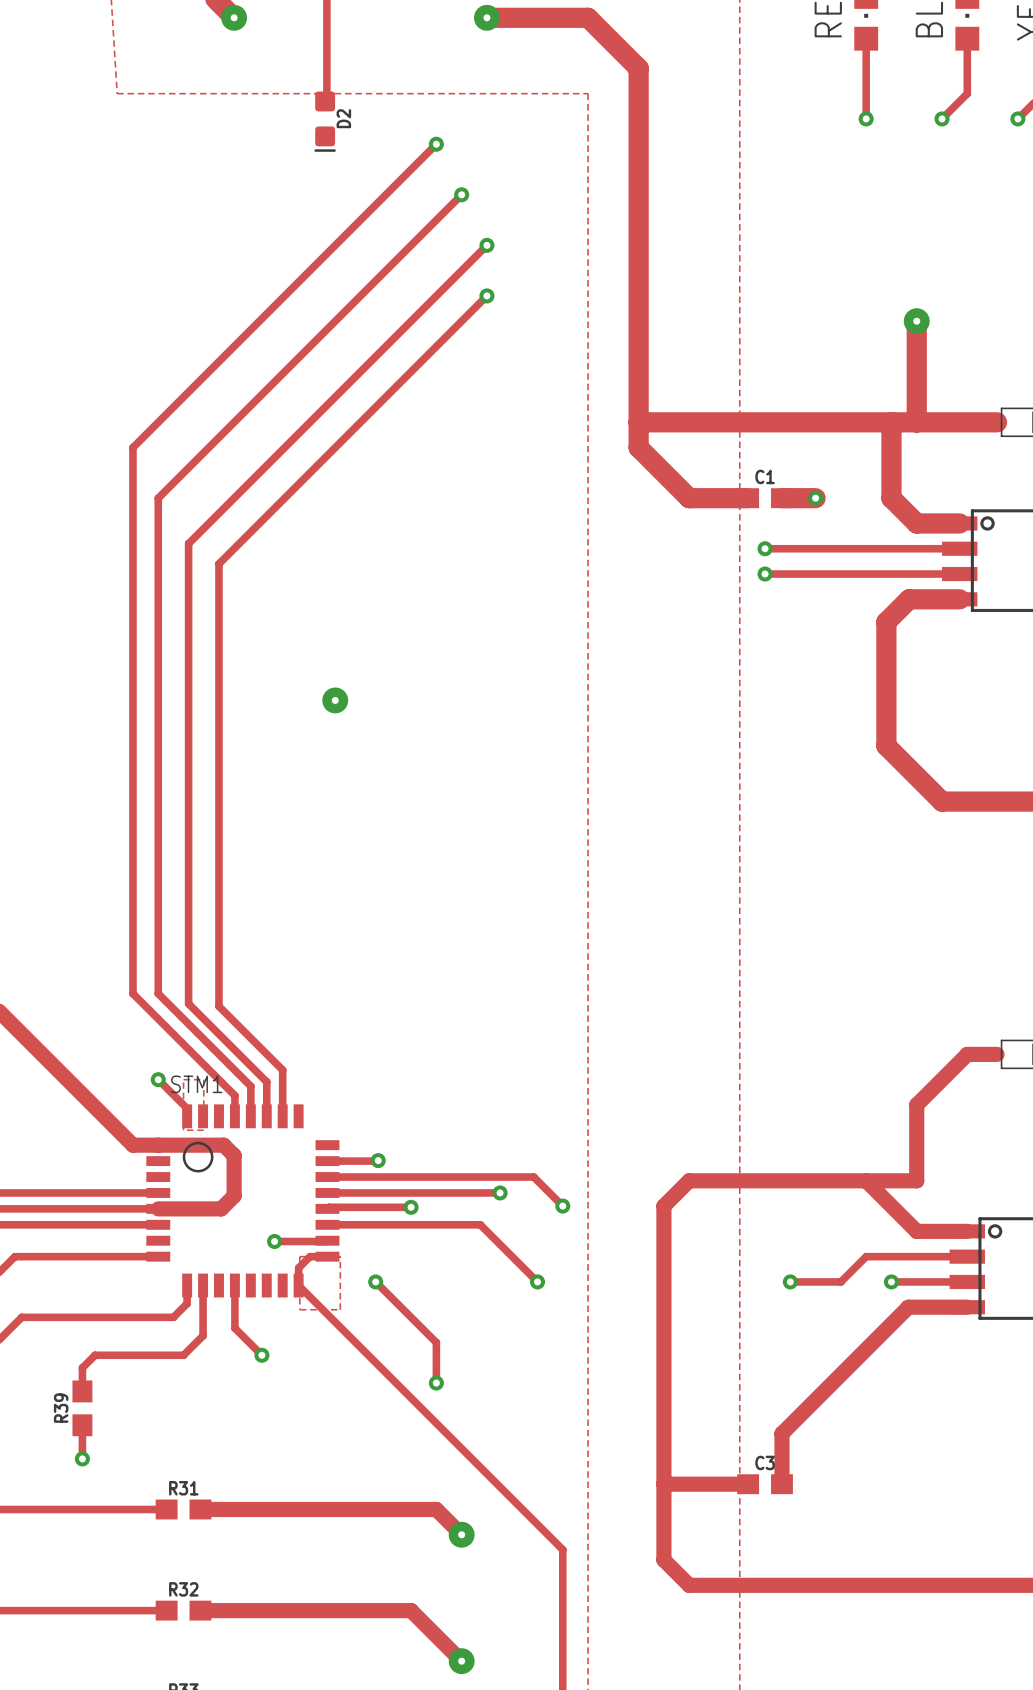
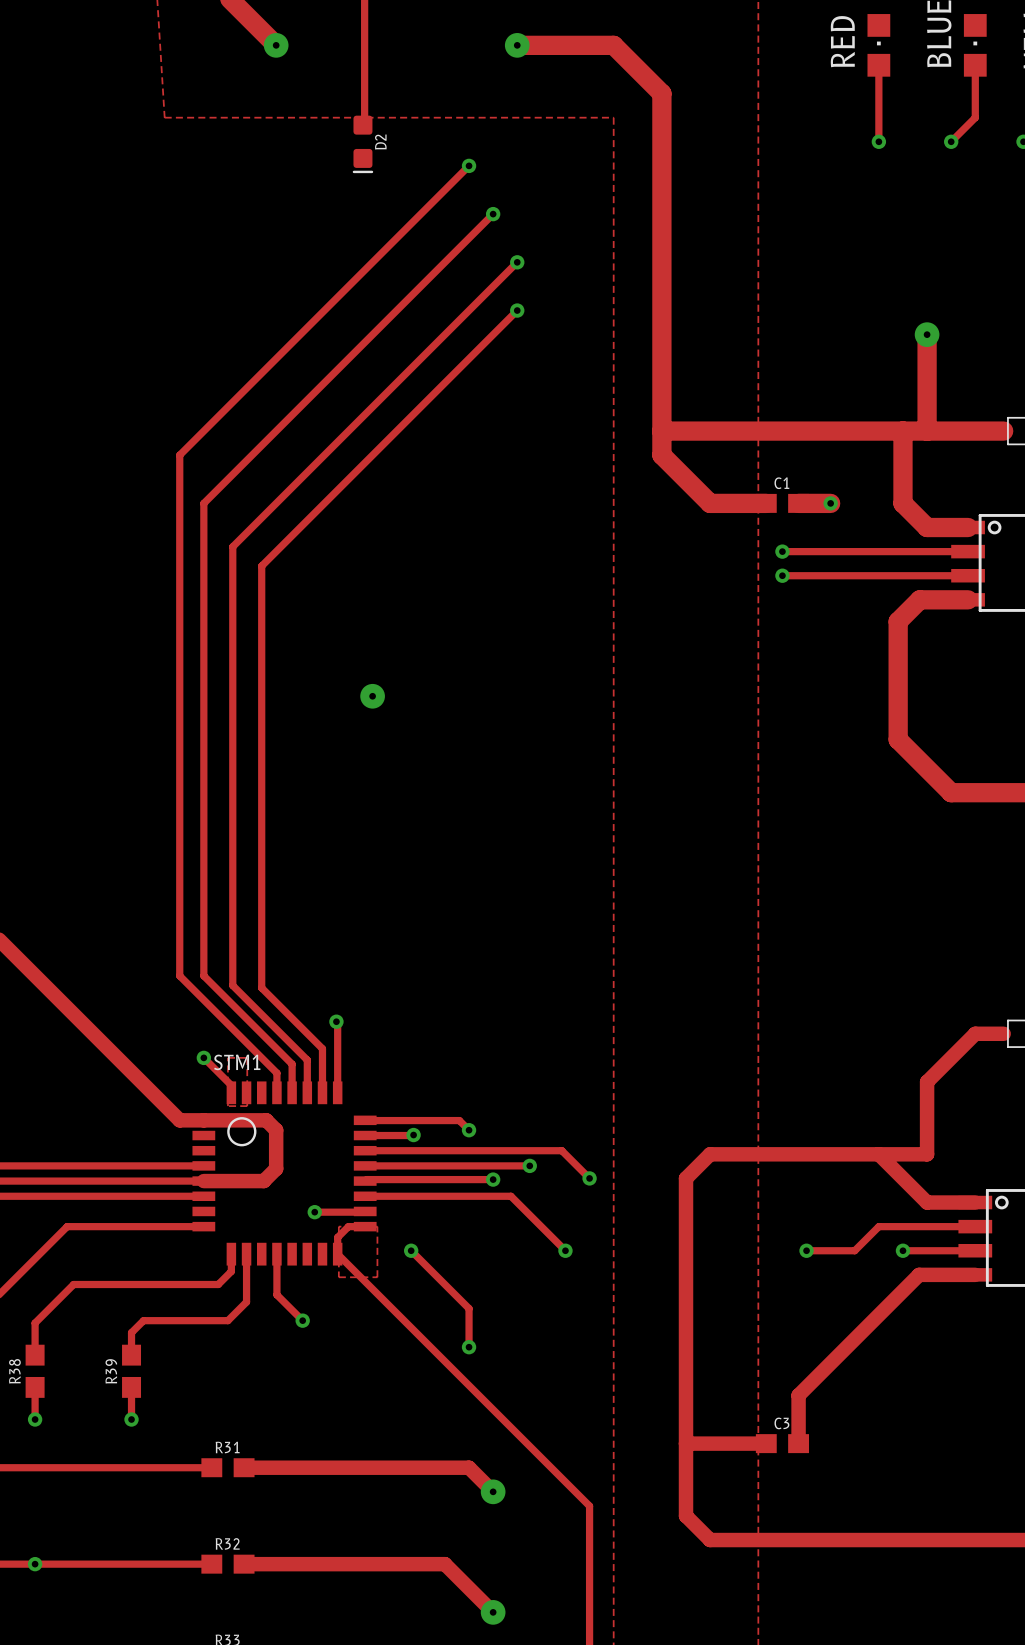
track: none -> (336, 1021) (337, 1092)
via: none -> (336, 1021)
track: none -> (365, 1120) (459, 1120) (469, 1130)
via: none -> (469, 1130)
track: none -> (444, 1179) (493, 1179)
via: (411, 1207) -> none
via: none -> (493, 1179)

